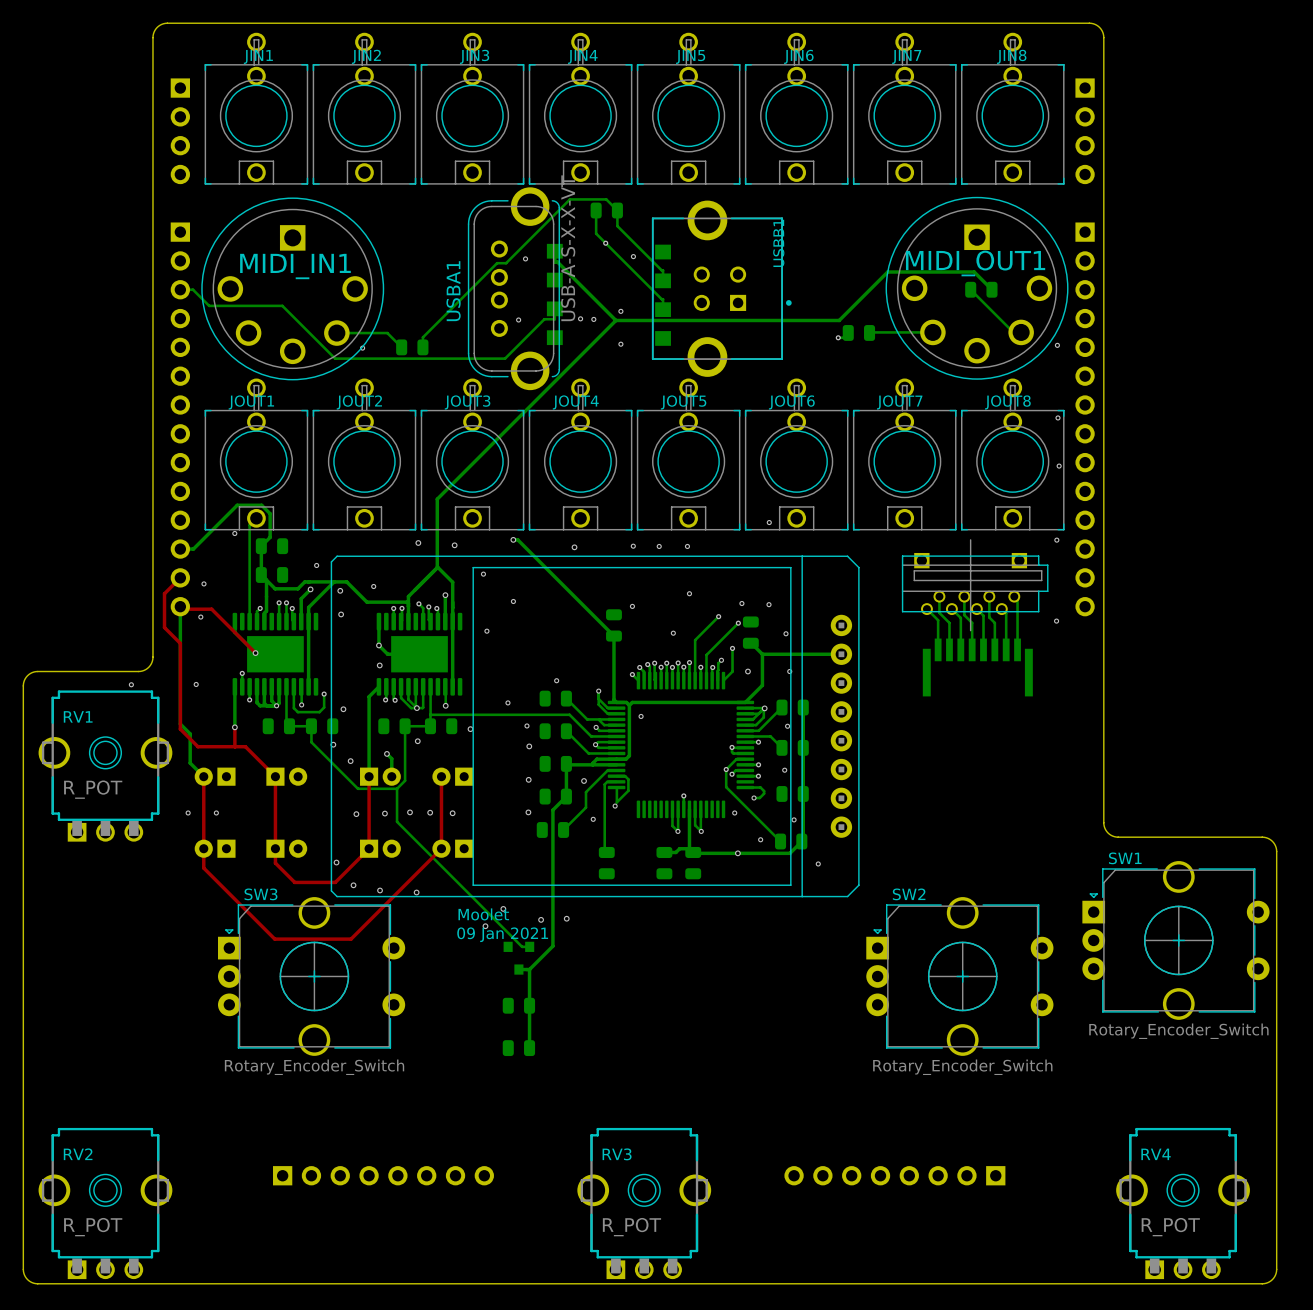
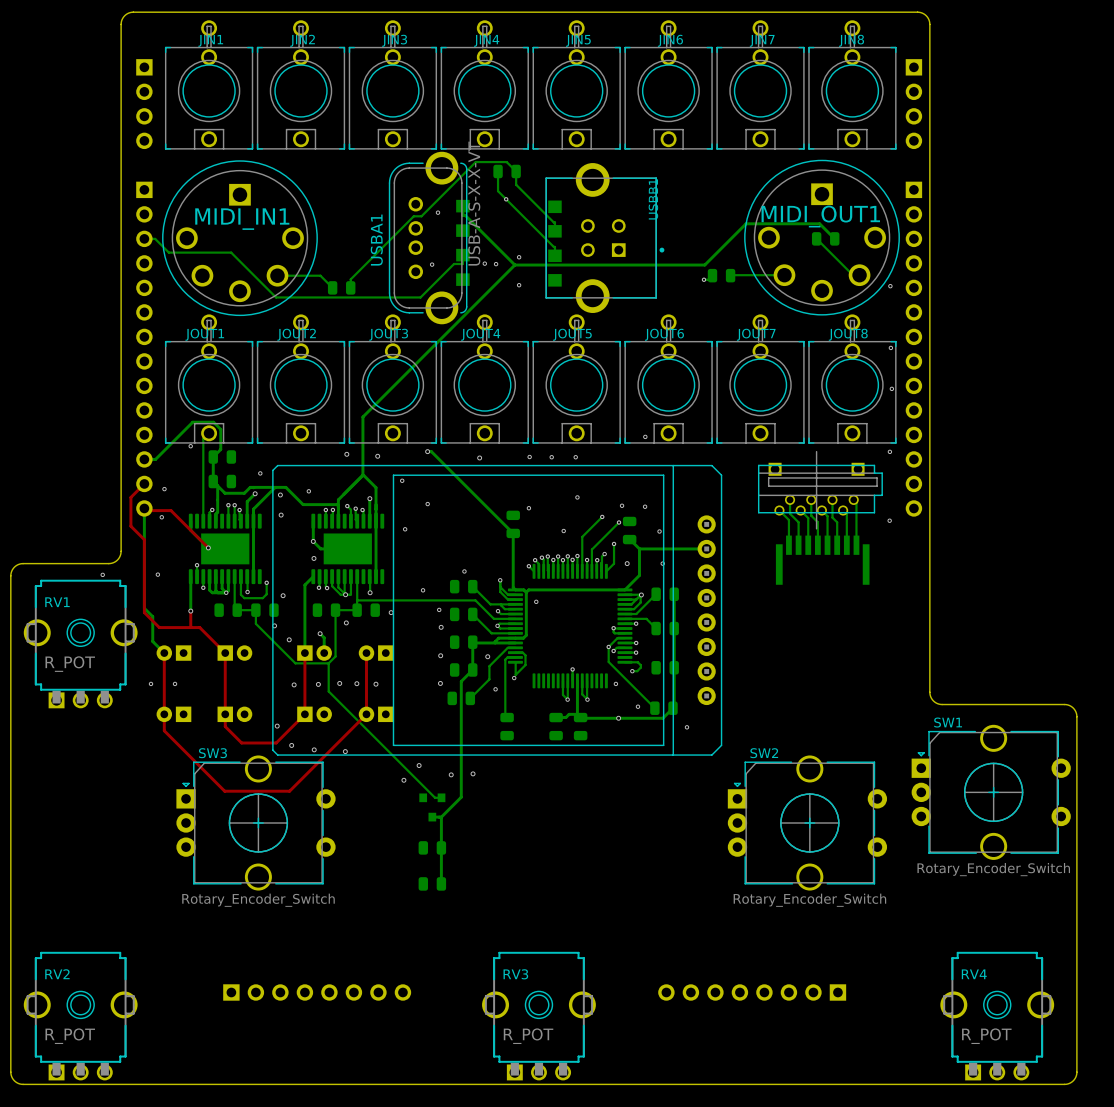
via: (633, 256) -> none
via: (362, 348) -> none
via: (787, 726) -> none
via: (784, 770) -> none
via: (794, 819) -> none
text: Moolet (483, 914) -> none
text: 09 Jan 2021 (502, 934) -> none

